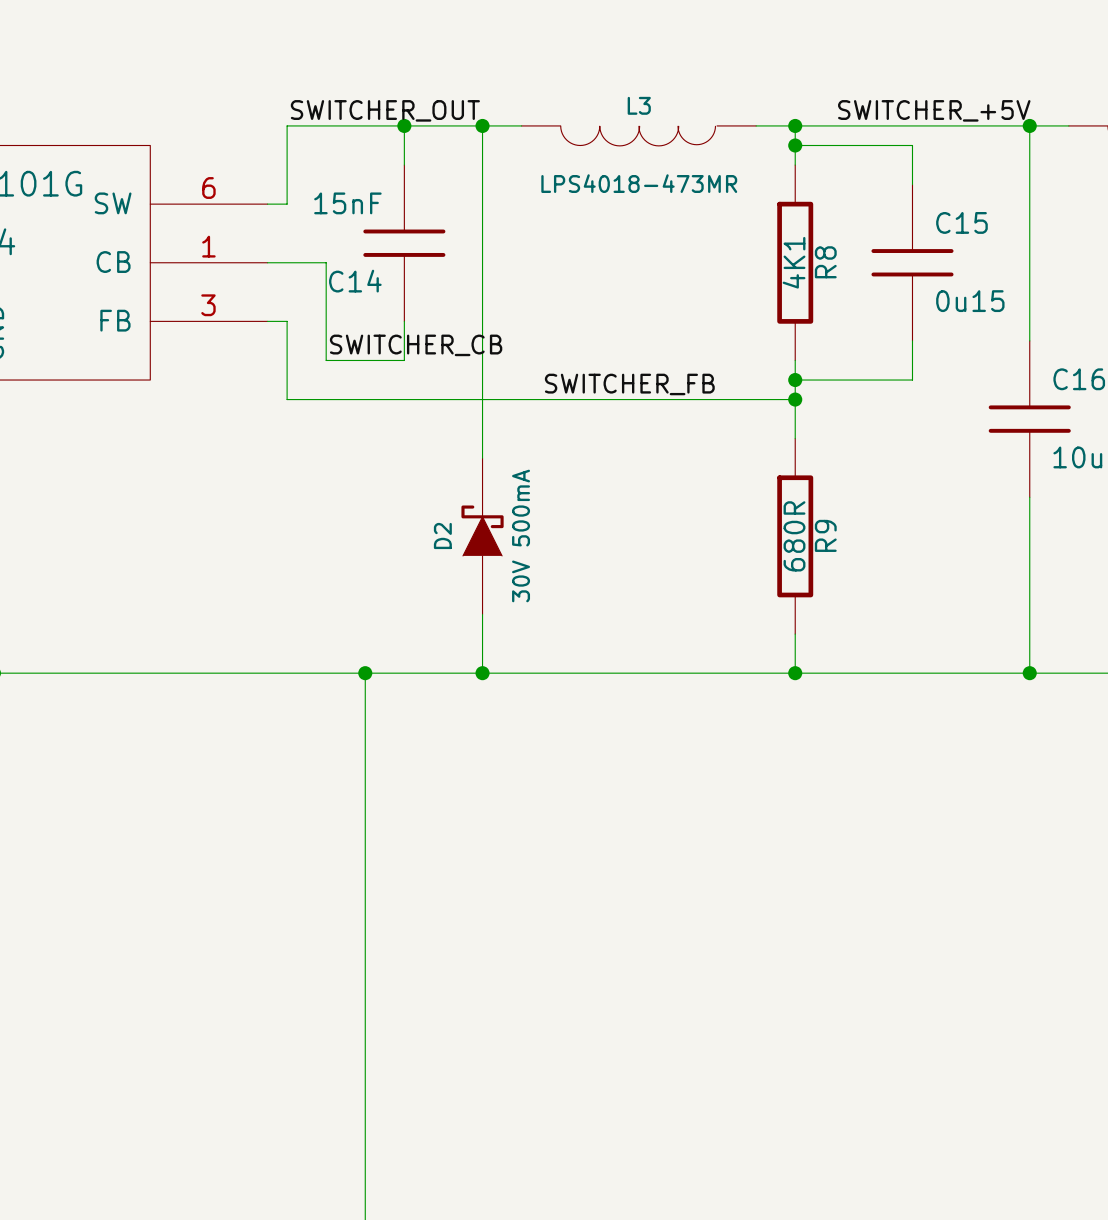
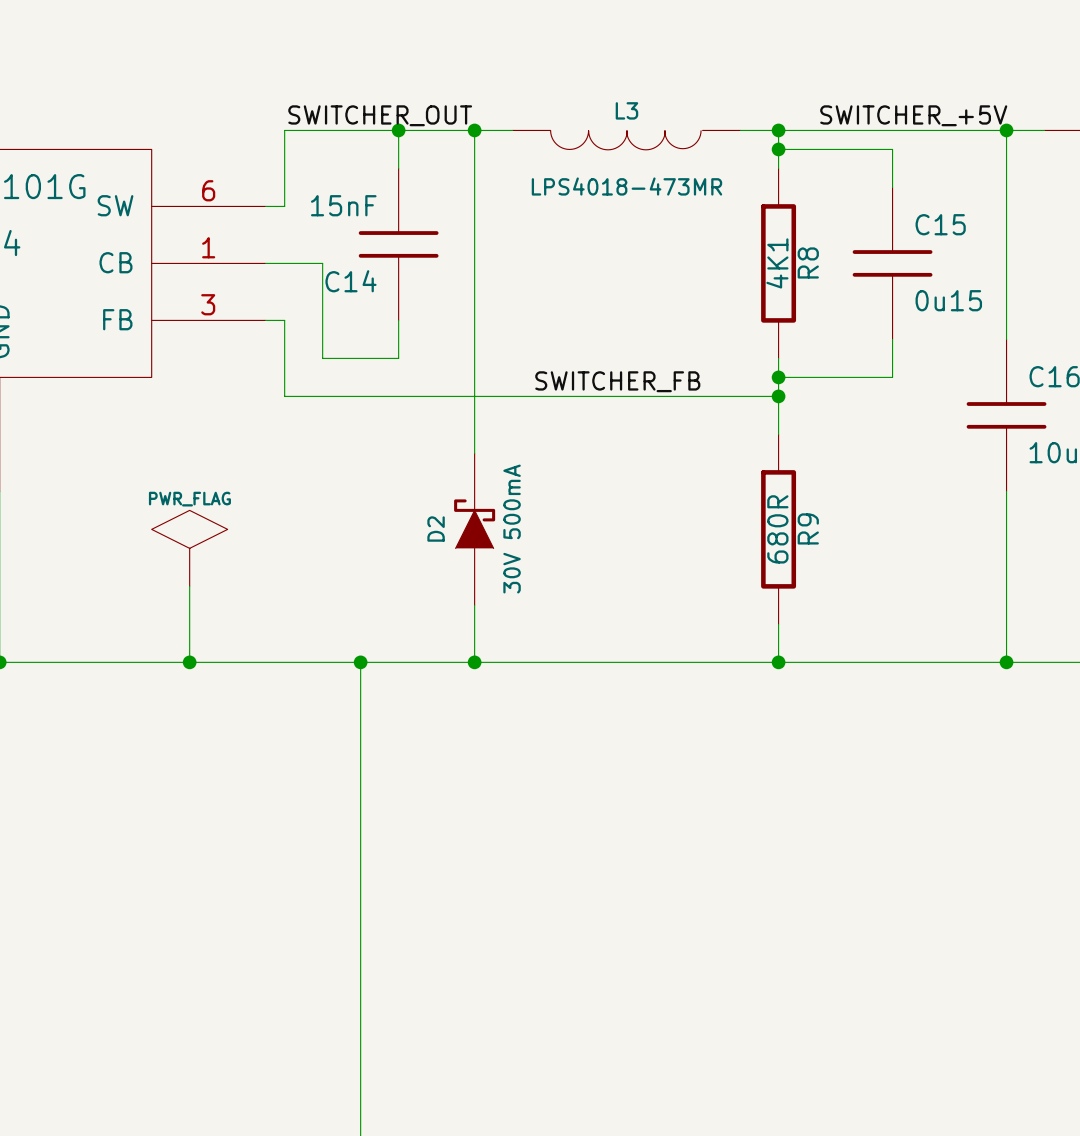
label: SWITCHER_CB (416, 345) -> none
power symbol: none -> PWR_FLAG (189, 548)
wire: none -> (189, 586) (189, 662)
junction: none -> (189, 662)

